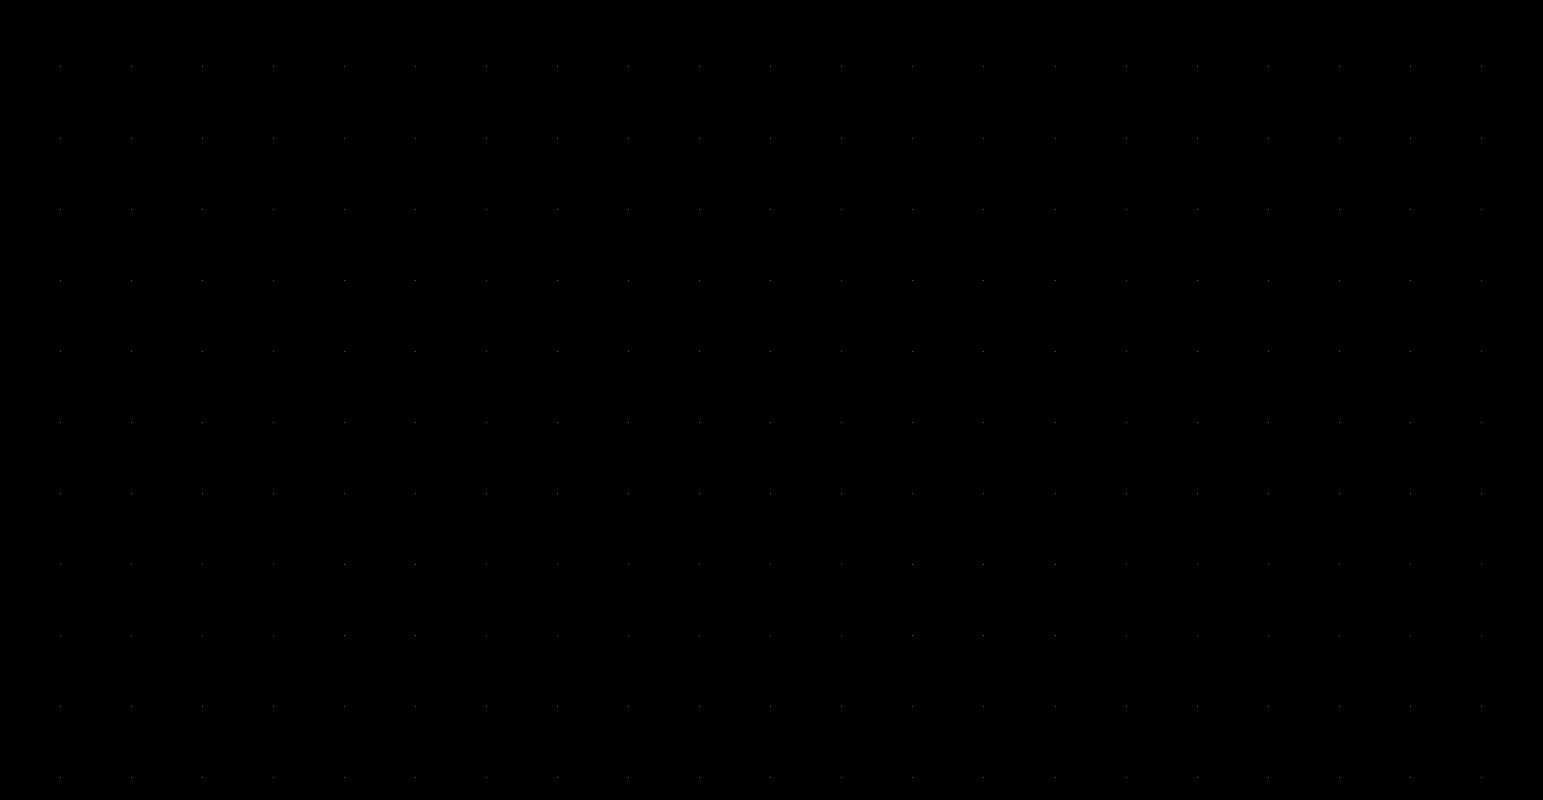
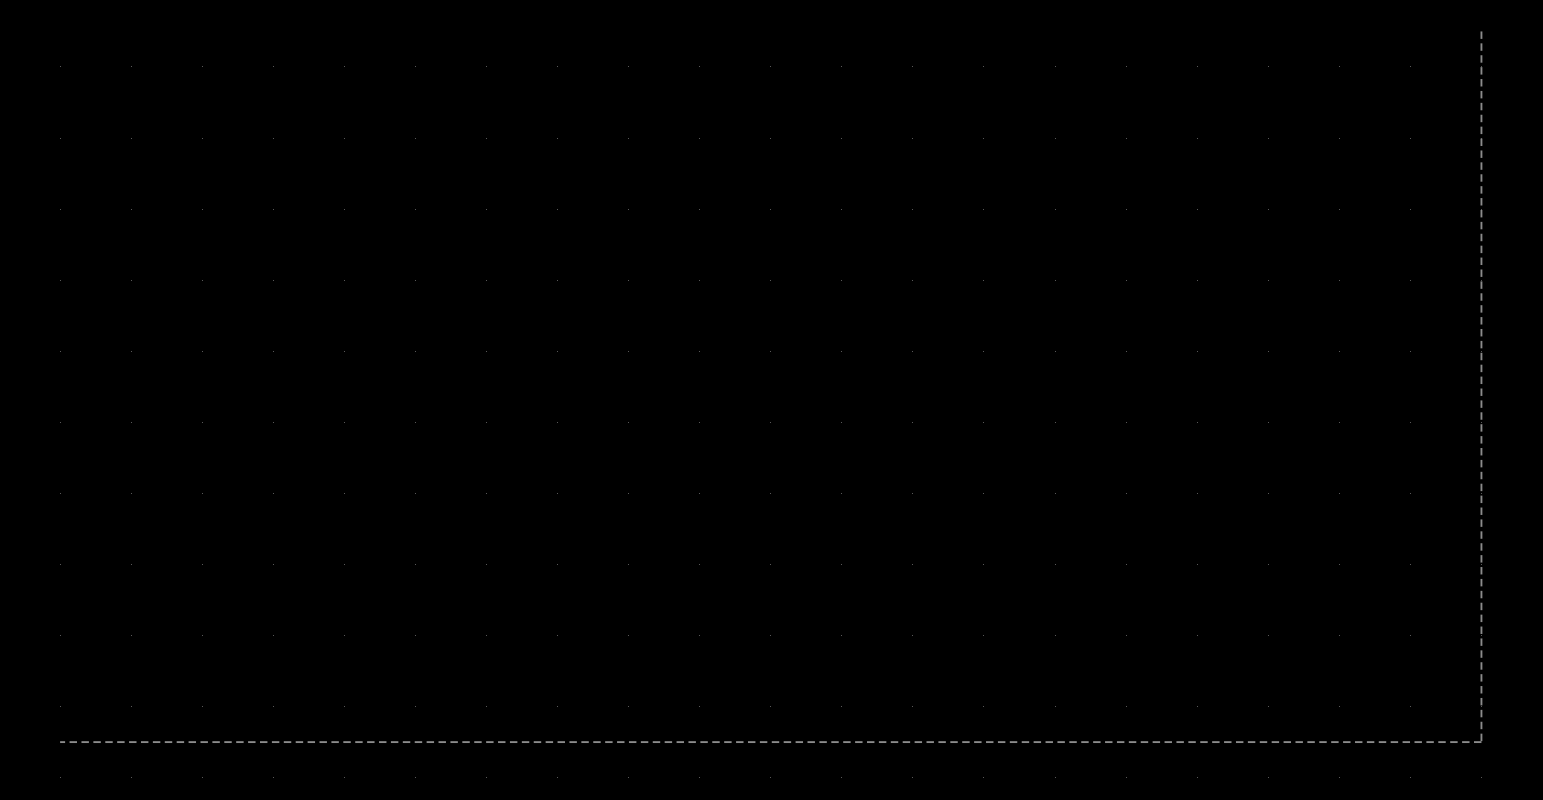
line: none -> (1481, 31) (1481, 742) (60, 742)

